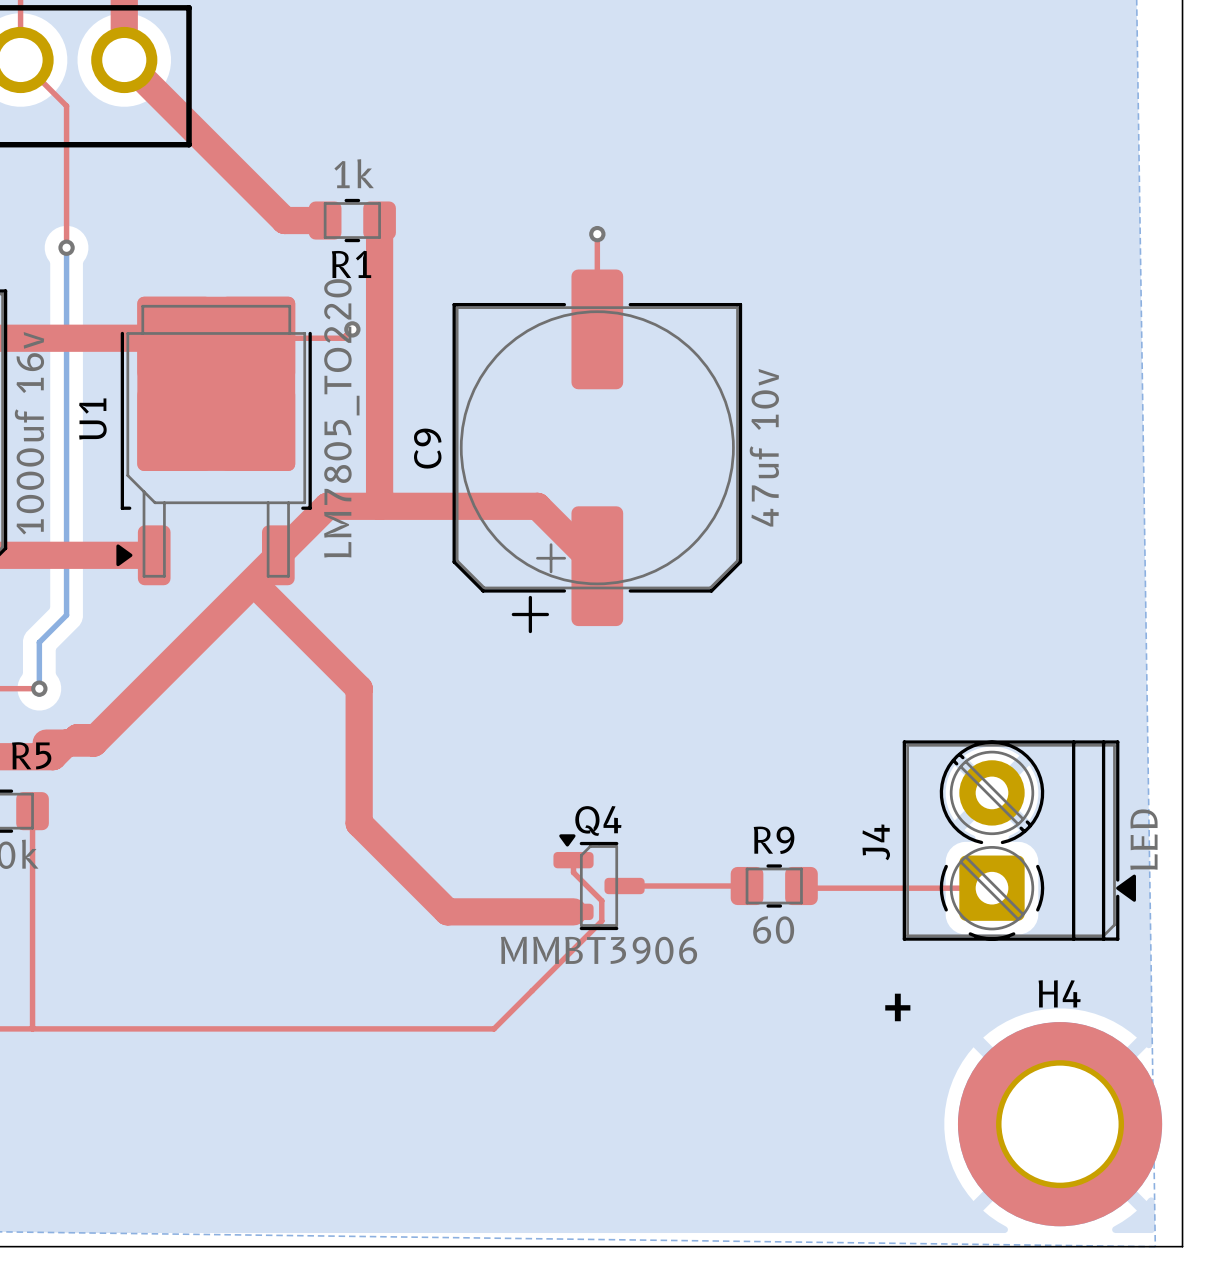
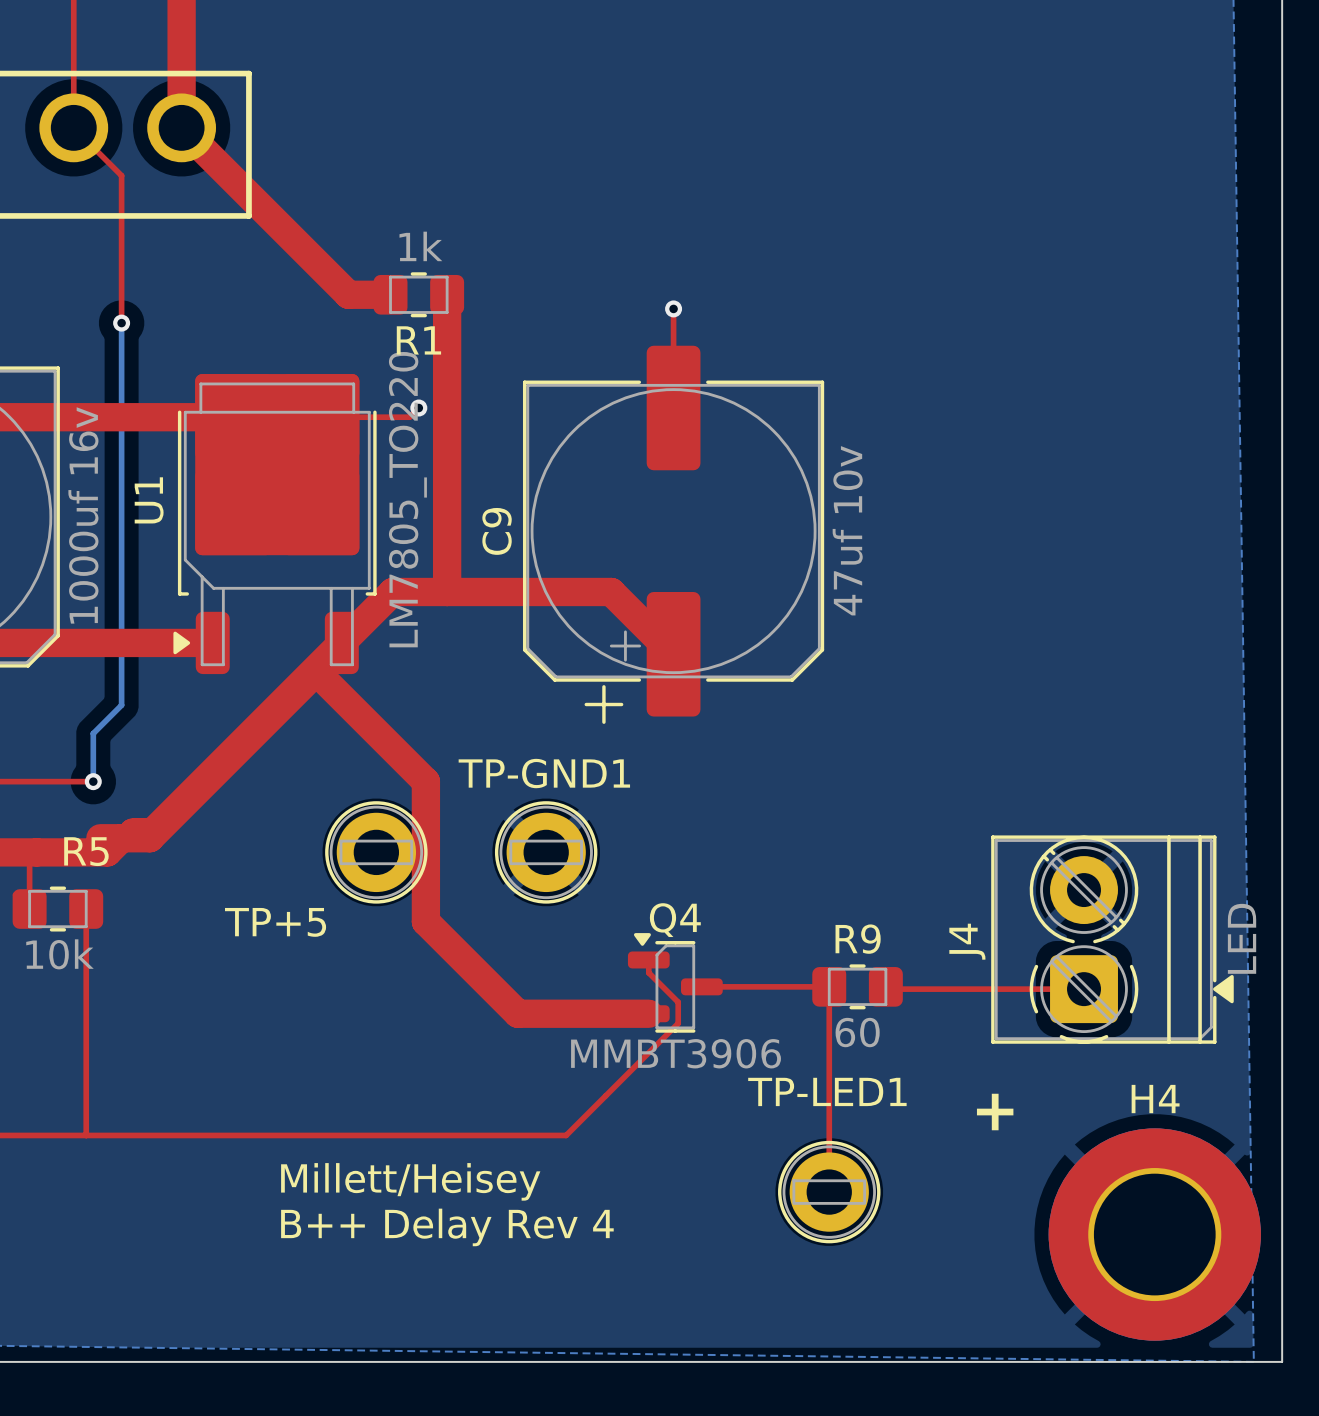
TP+5: none -> (376, 852)
TP-GND1: none -> (546, 852)
top track: none -> (829, 986) (829, 1192)
text: none -> Millett/Heisey (410, 1181)
TP-LED1: none -> (829, 1192)
text: none -> B++ Delay Rev 4 (447, 1227)

